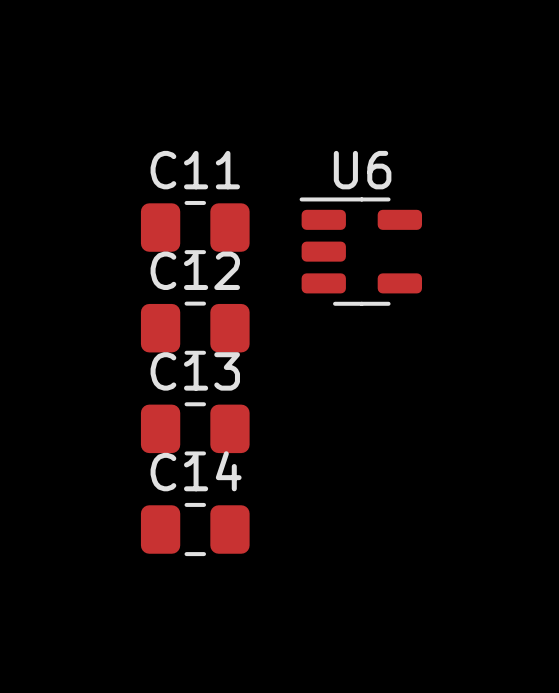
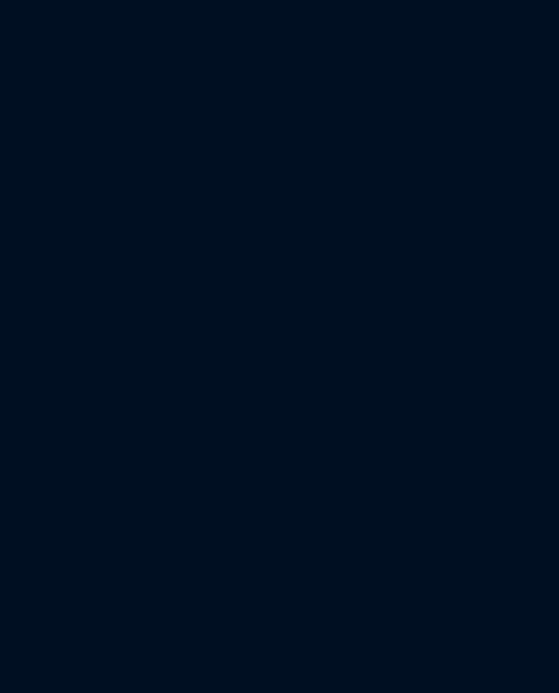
C11: (195, 227) -> none
U6: (360, 251) -> none
C12: (195, 328) -> none
C13: (195, 428) -> none
C14: (195, 529) -> none

